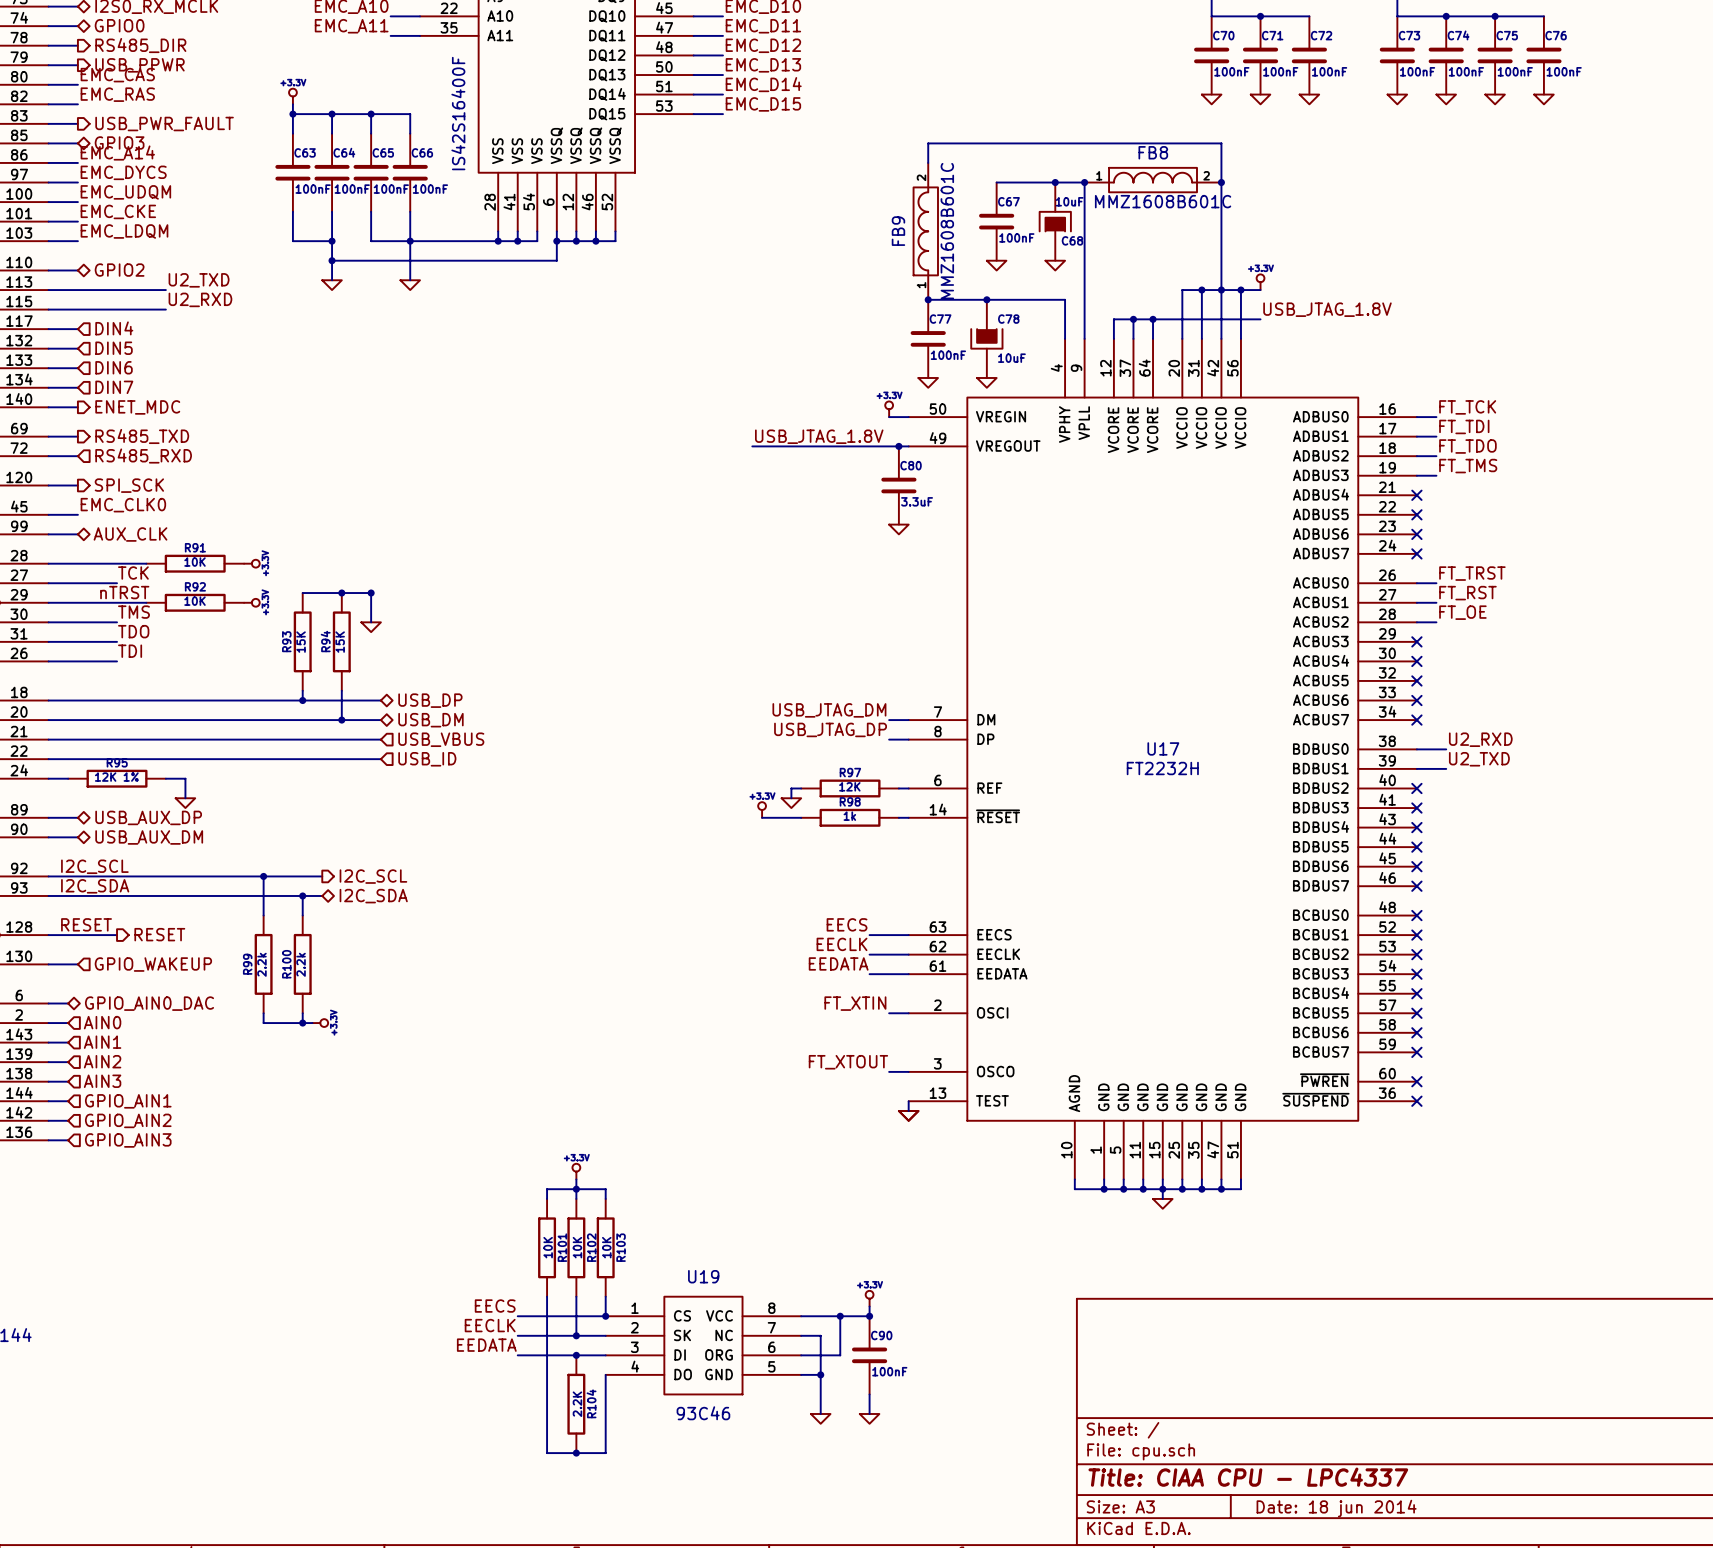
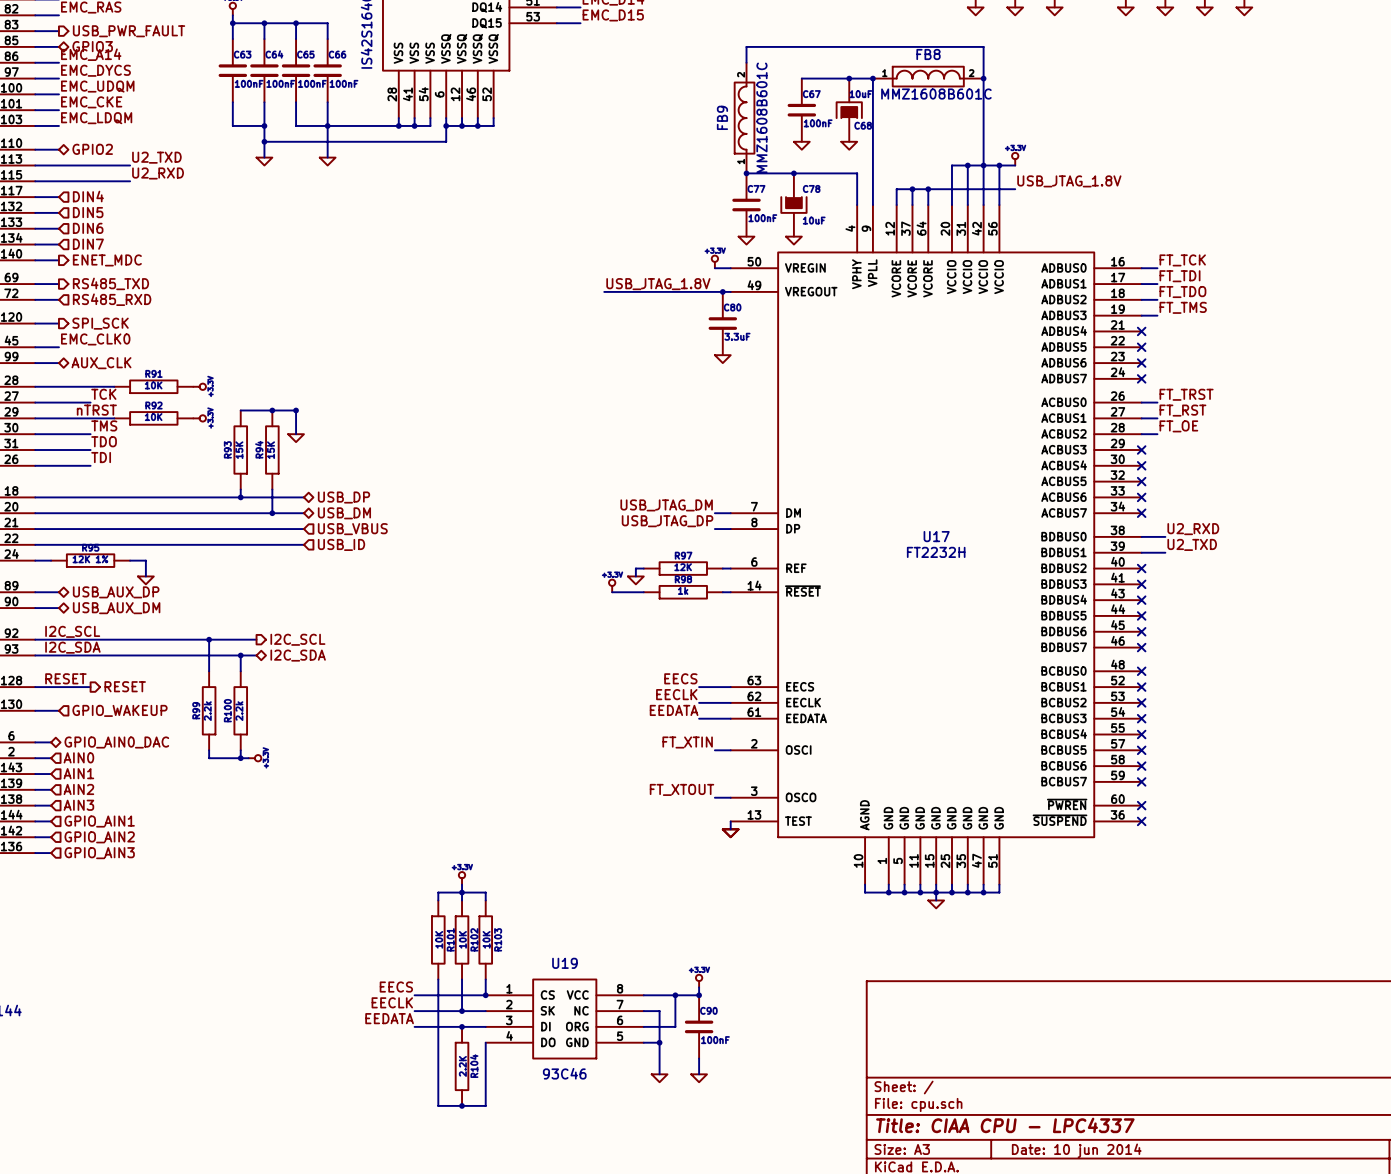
title block: Date: 18 jun 2014 (1336, 1508) -> Date: 10 jun 2014 (1076, 1150)

